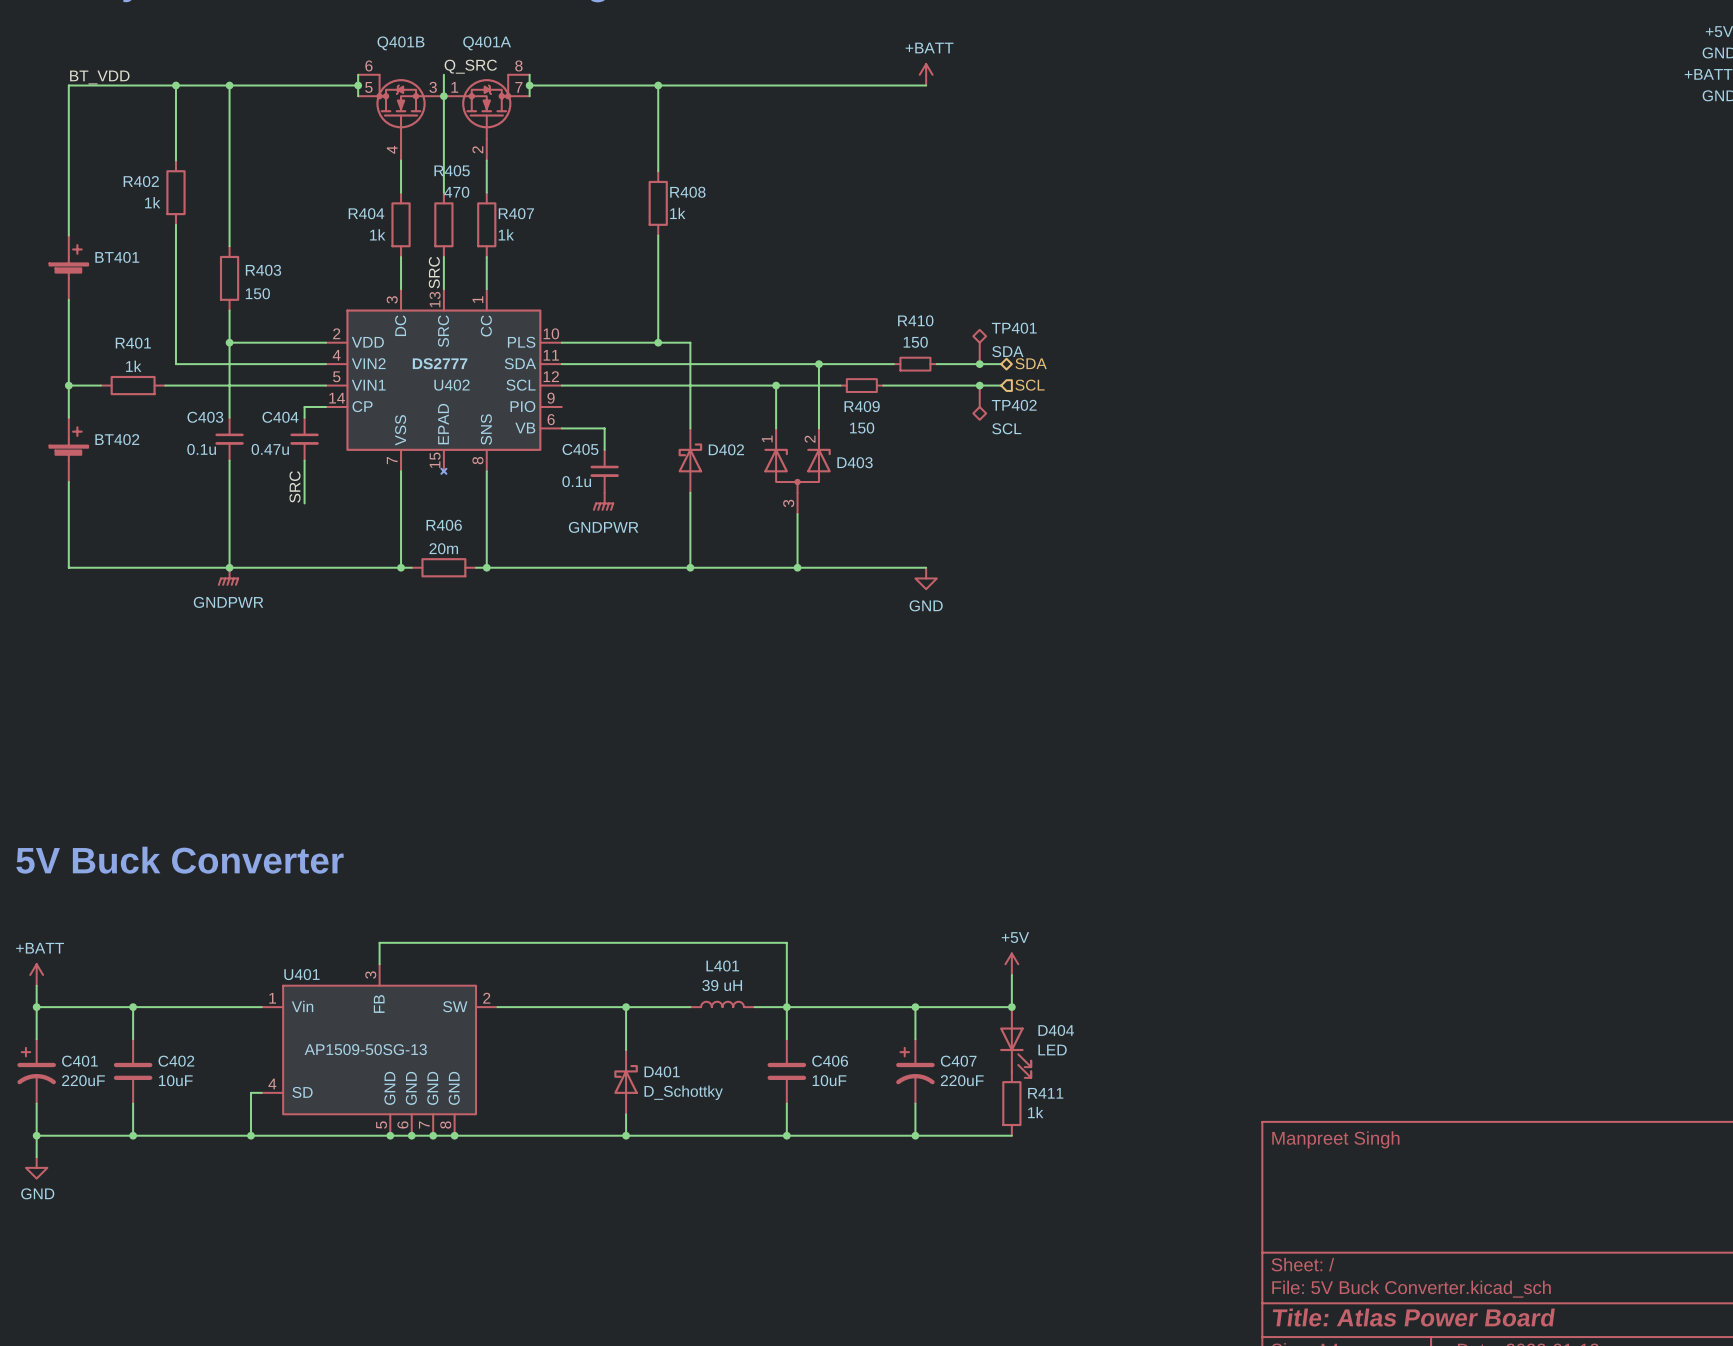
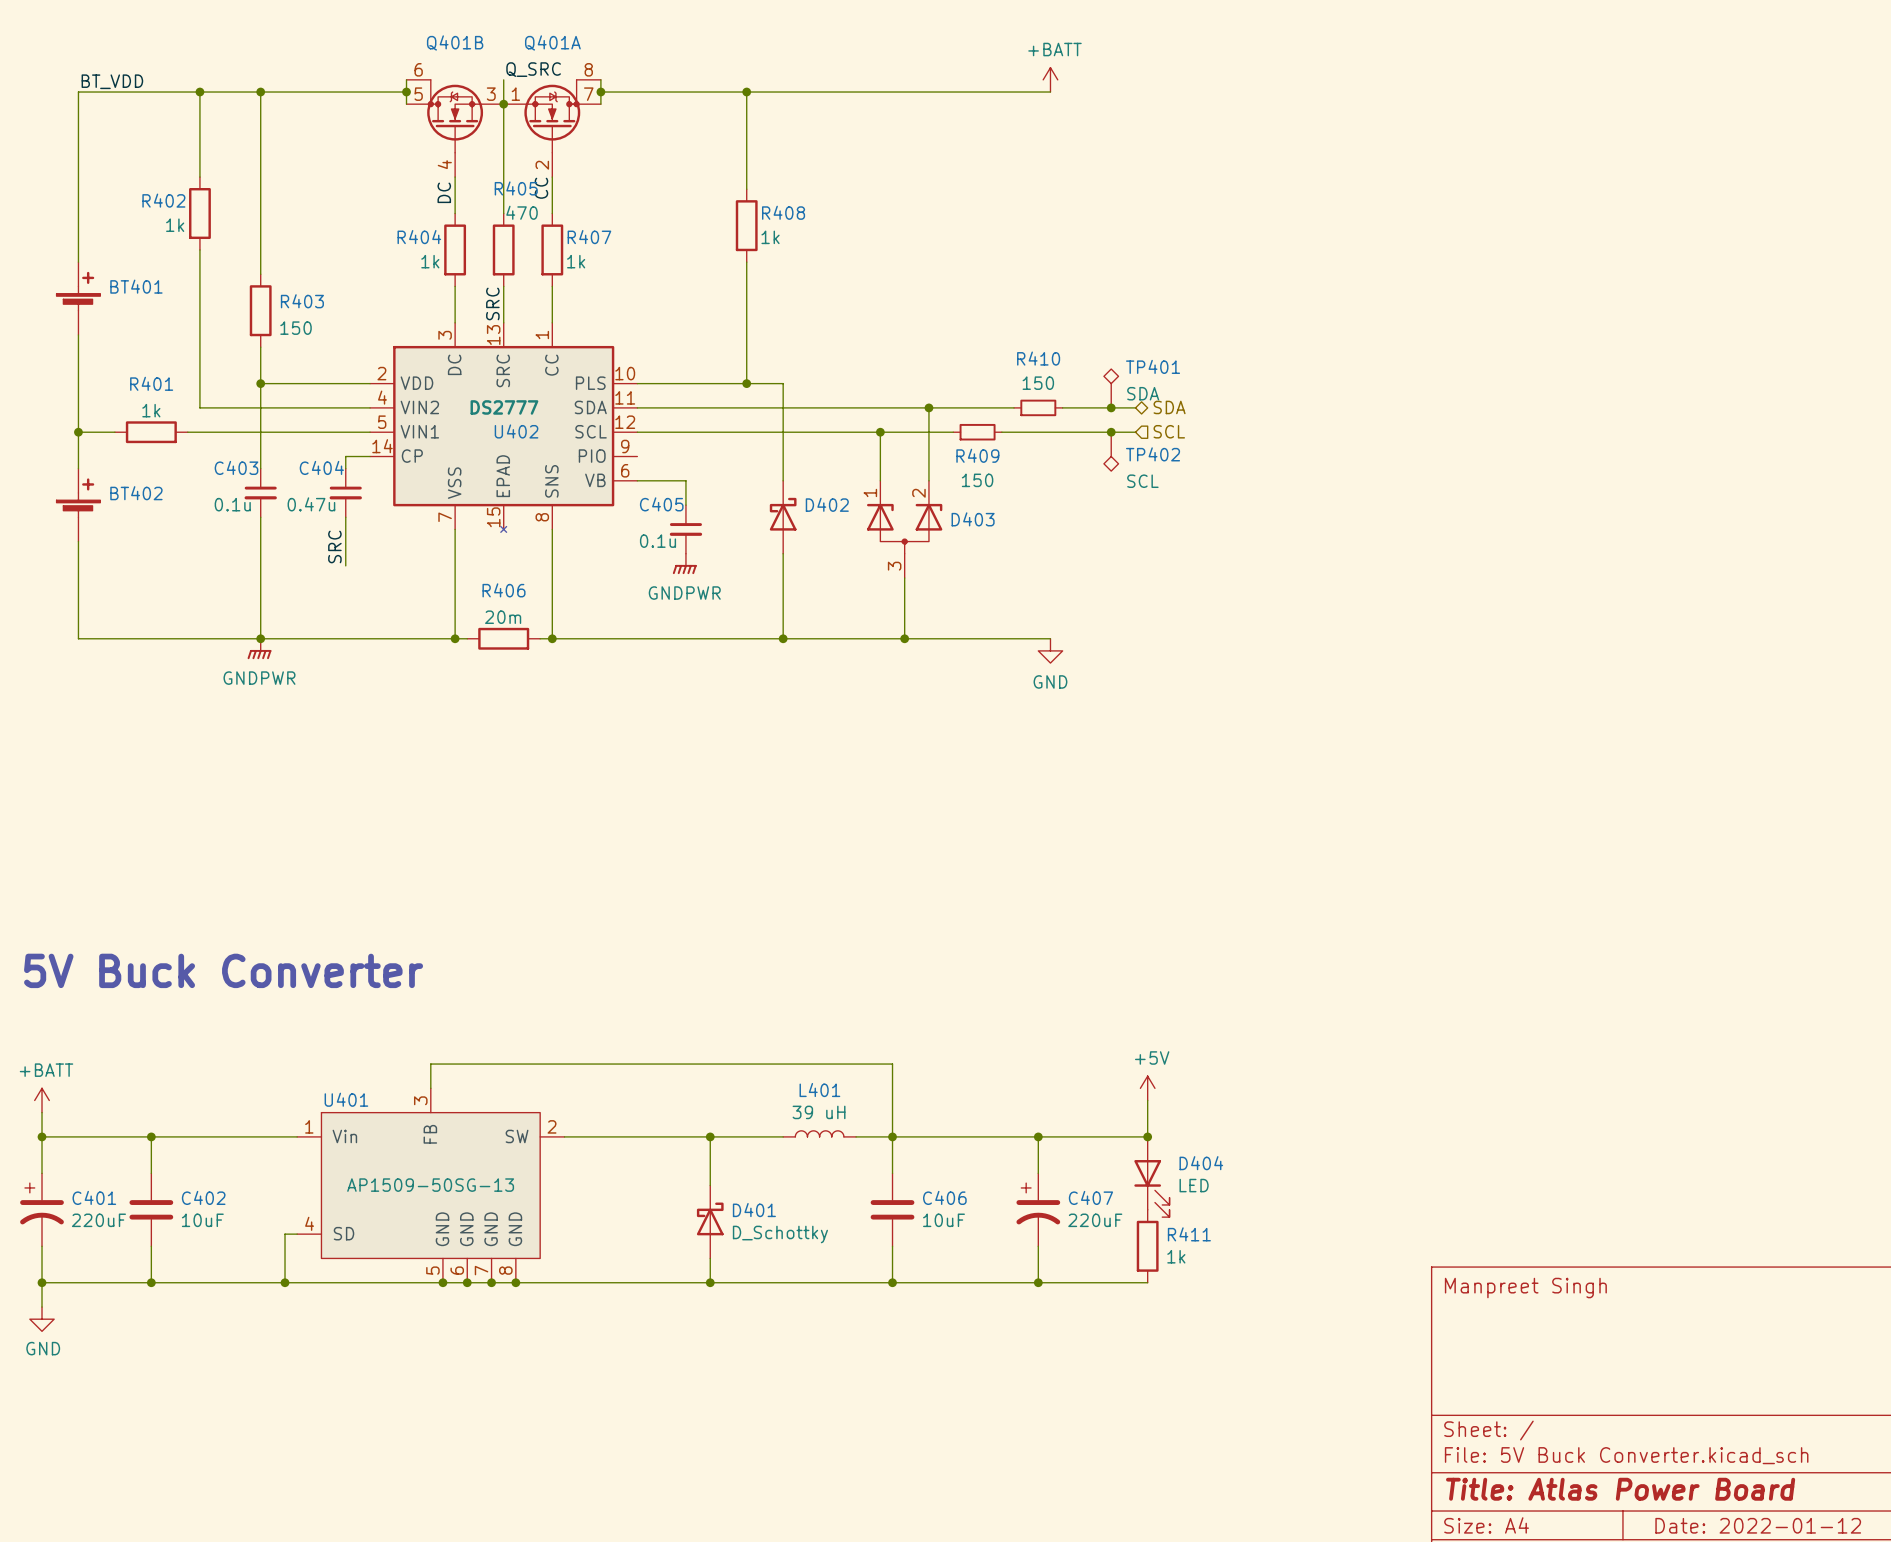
label: none -> CC (541, 188)
label: none -> DC (444, 192)

